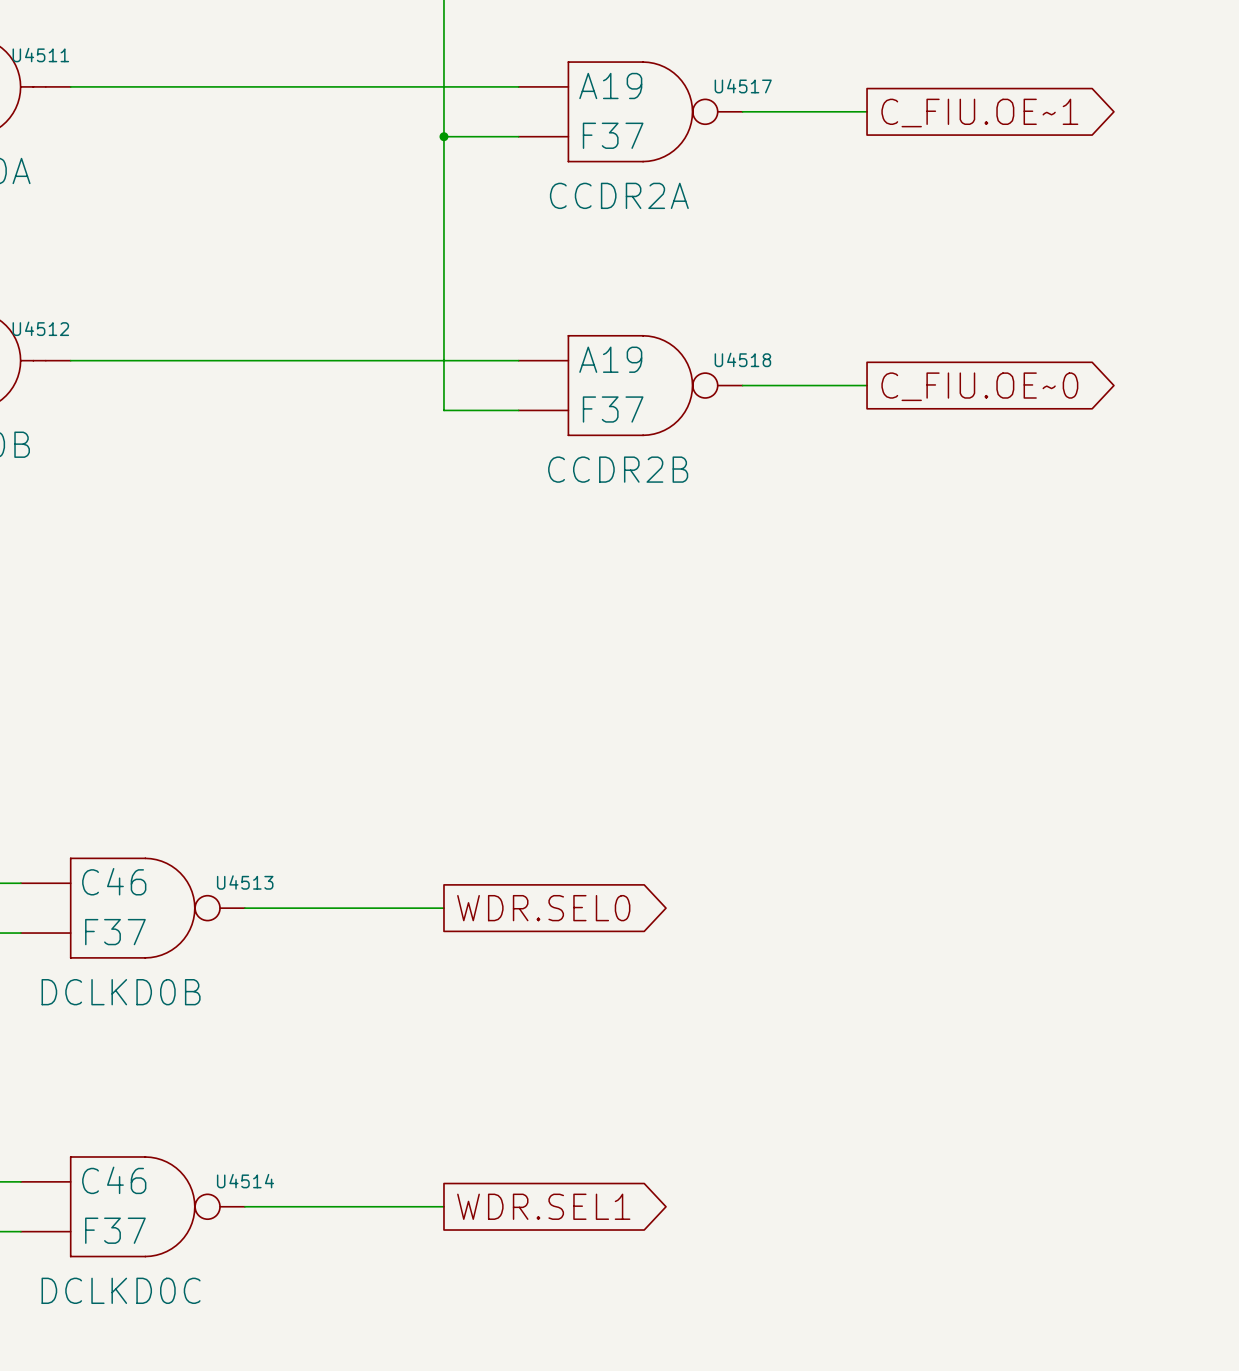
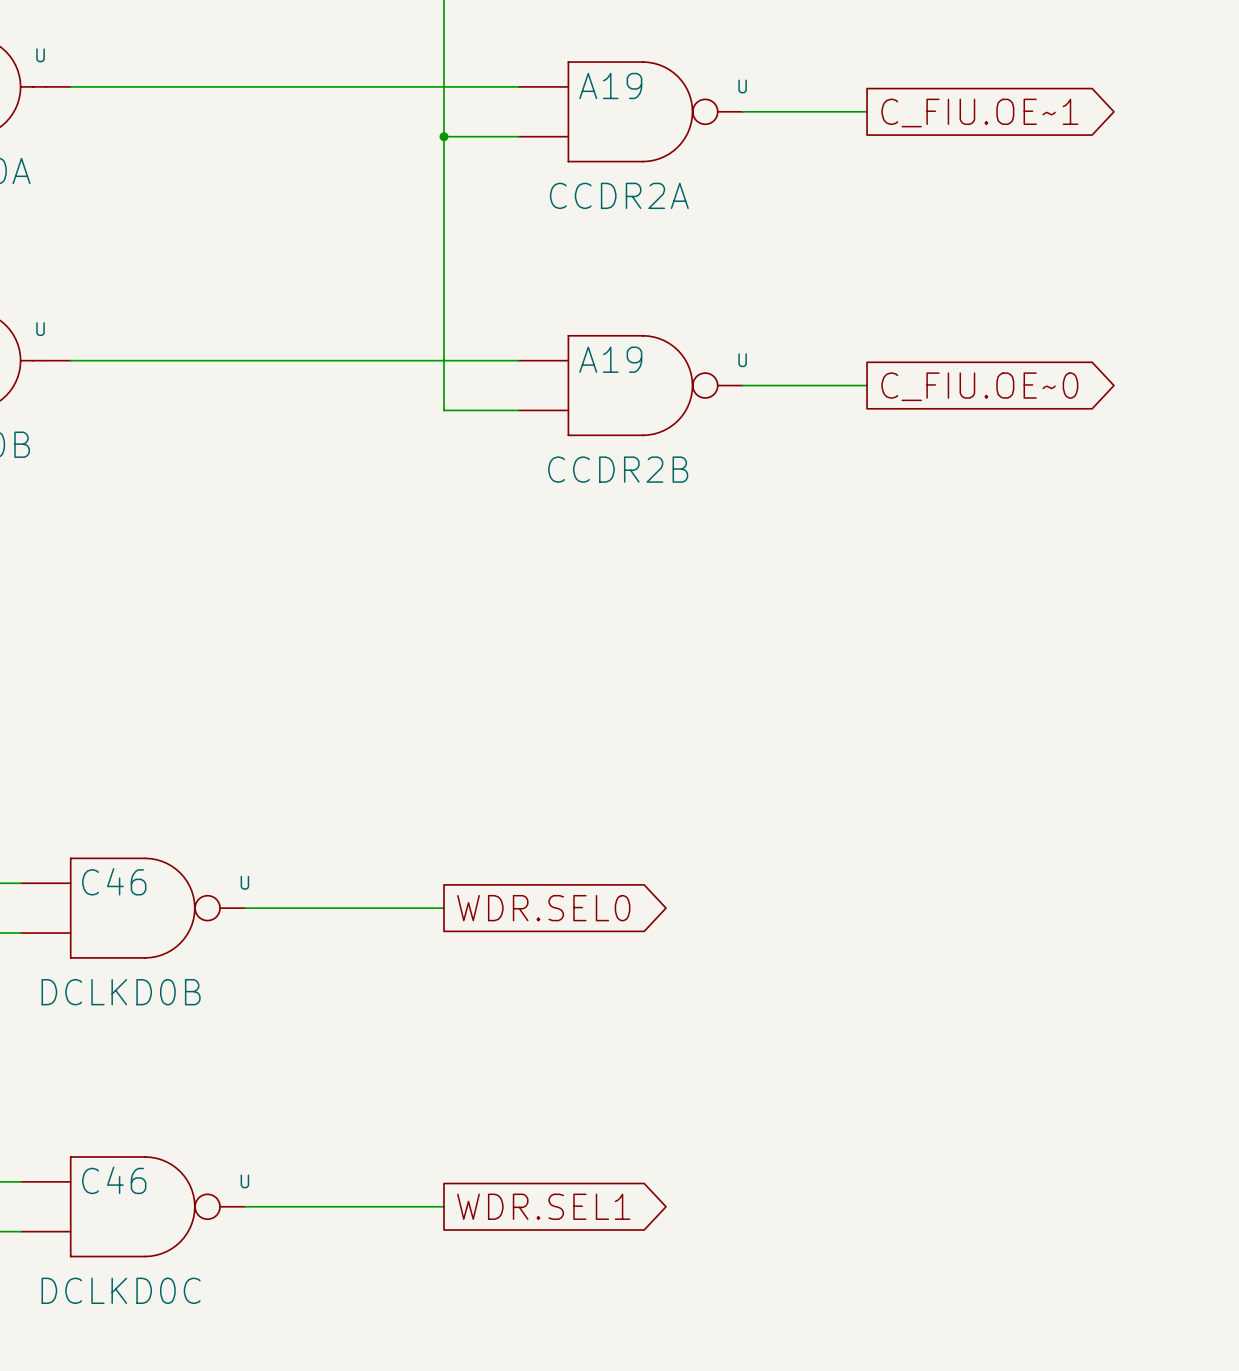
U4511 name: U4511 (40, 55) -> U (40, 55)
U4517 name: U4517 (743, 86) -> U (742, 86)
U4517 value: F37 (613, 135) -> none
U4512 name: U4512 (40, 328) -> U (40, 329)
U4518 name: U4518 (742, 359) -> U (742, 360)
U4518 value: F37 (613, 409) -> none
U4513 name: U4513 (245, 882) -> U (244, 882)
U4513 value: F37 (115, 932) -> none
U4514 name: U4514 (245, 1181) -> U (244, 1181)
U4514 value: F37 (115, 1230) -> none

